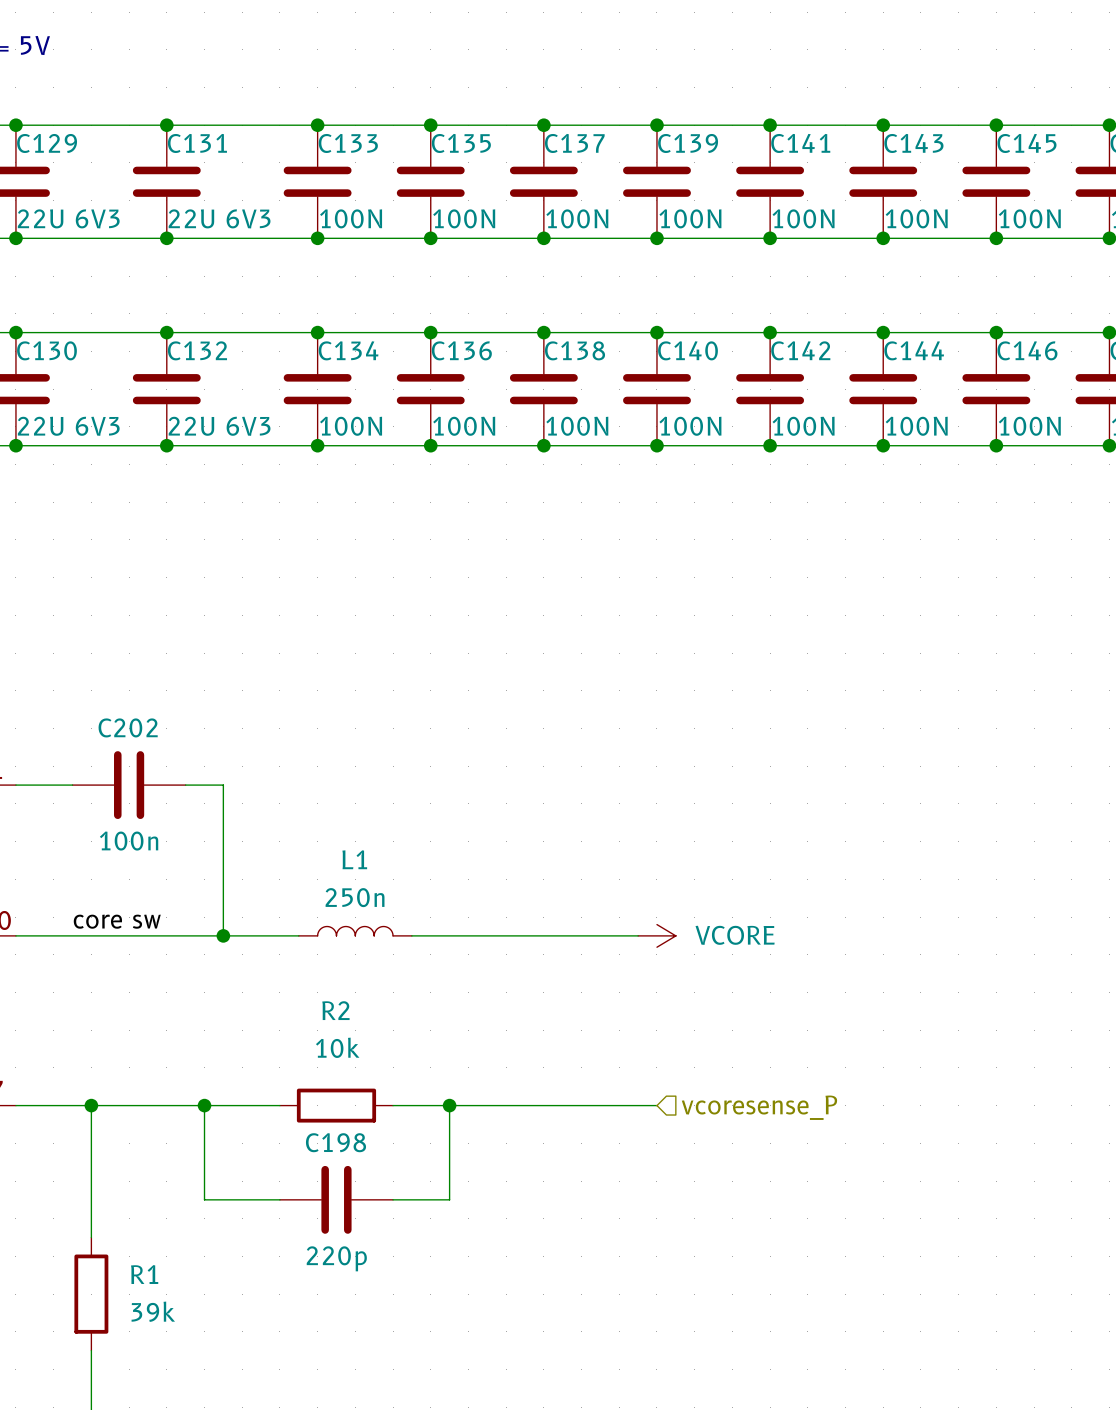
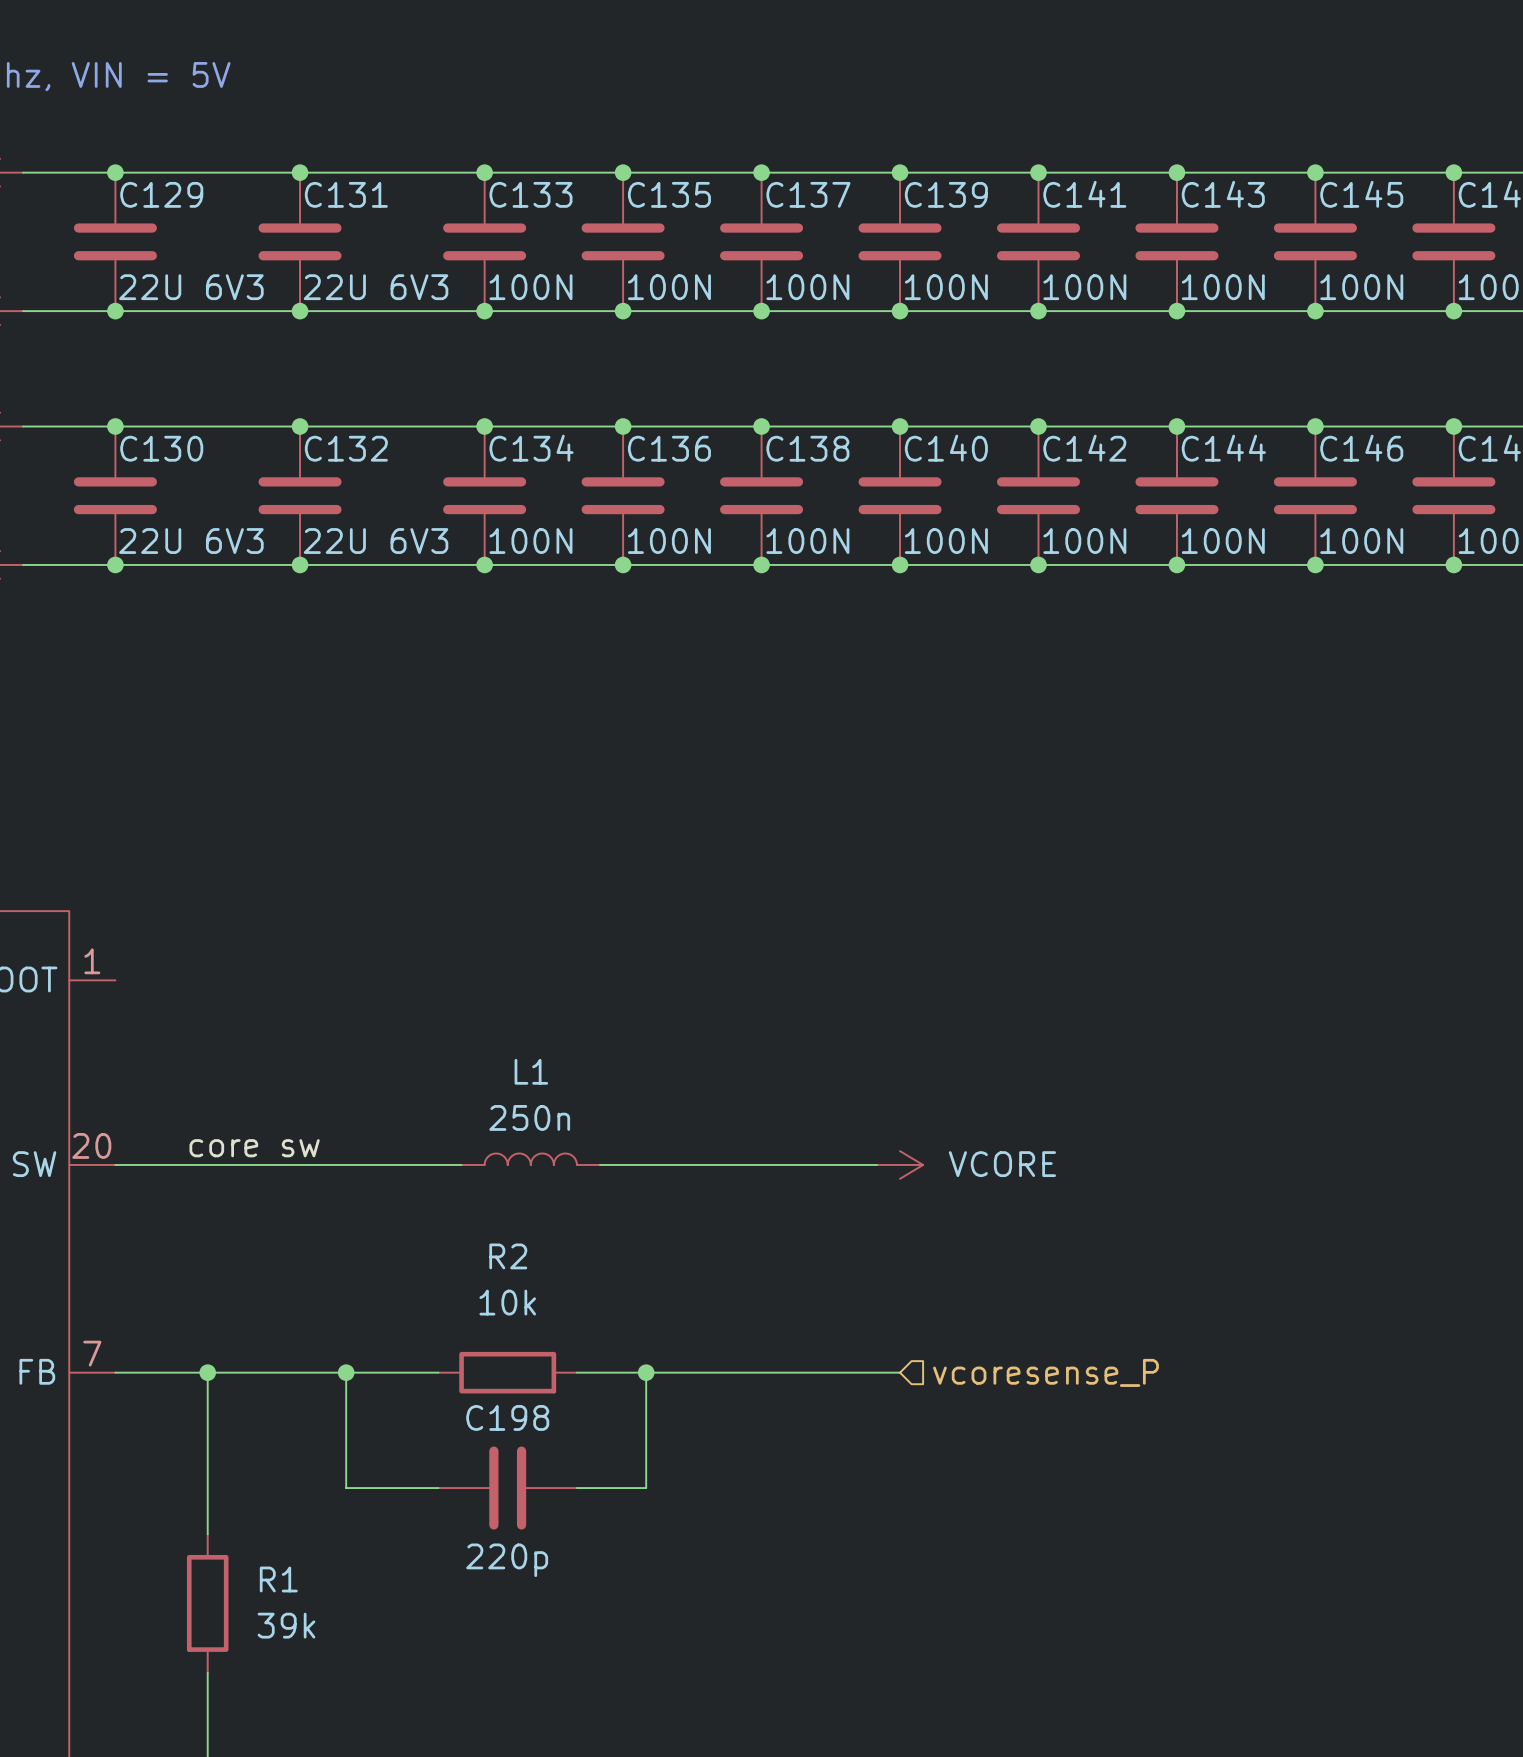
wire: (15, 785) (72, 785) -> none
C202: 100n (129, 785) -> none
wire: (185, 785) (223, 785) (223, 935) -> none
junction: (223, 935) -> none

